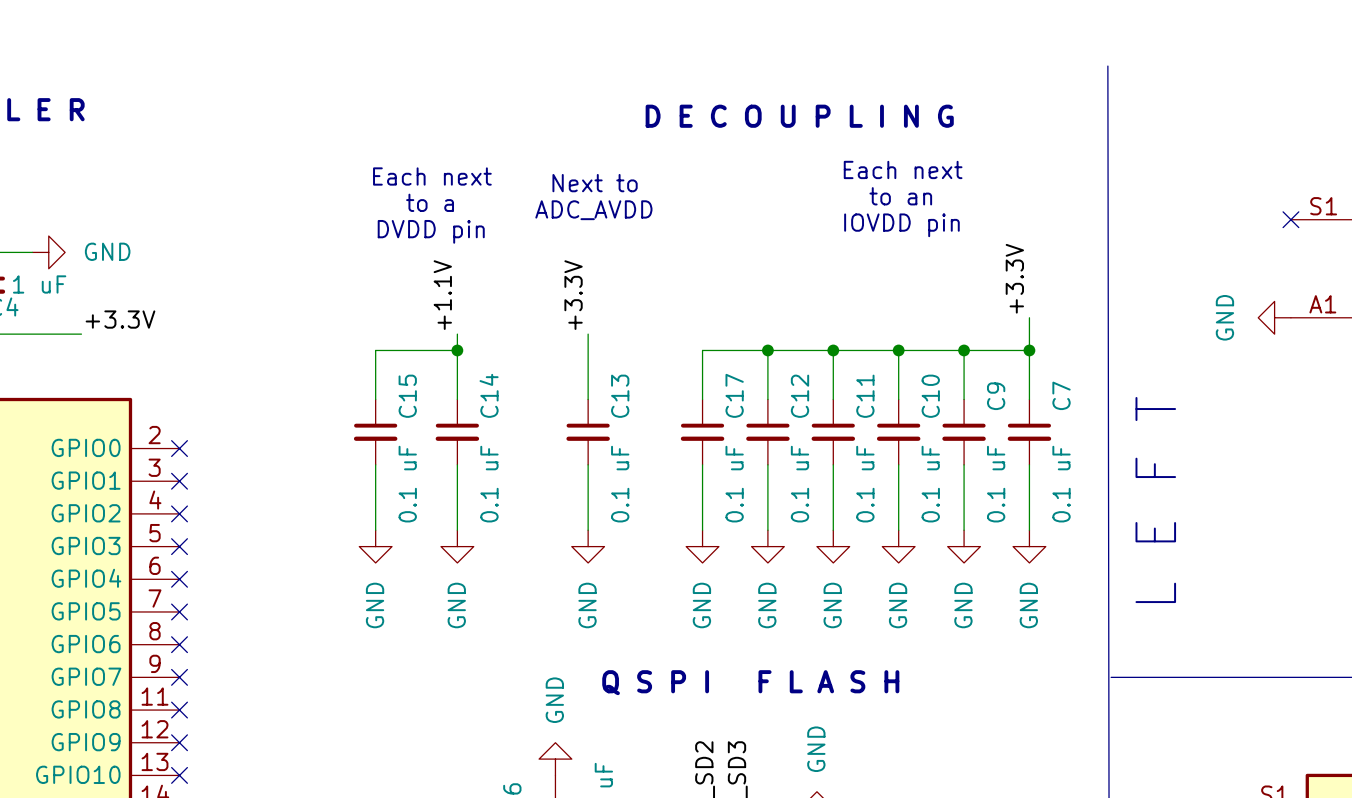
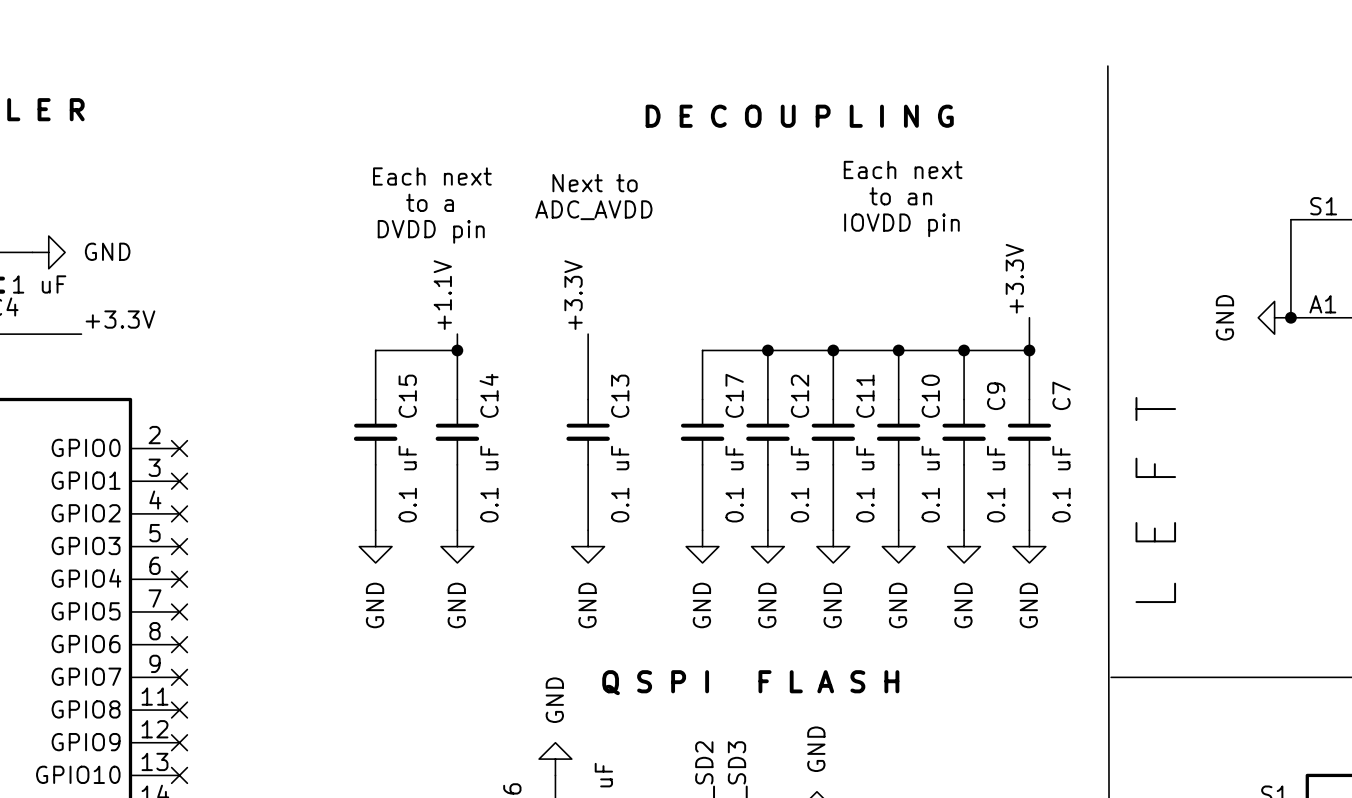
wire: none -> (1290, 219) (1290, 317)
no-connect mark: (1290, 219) -> none
junction: none -> (1290, 317)

